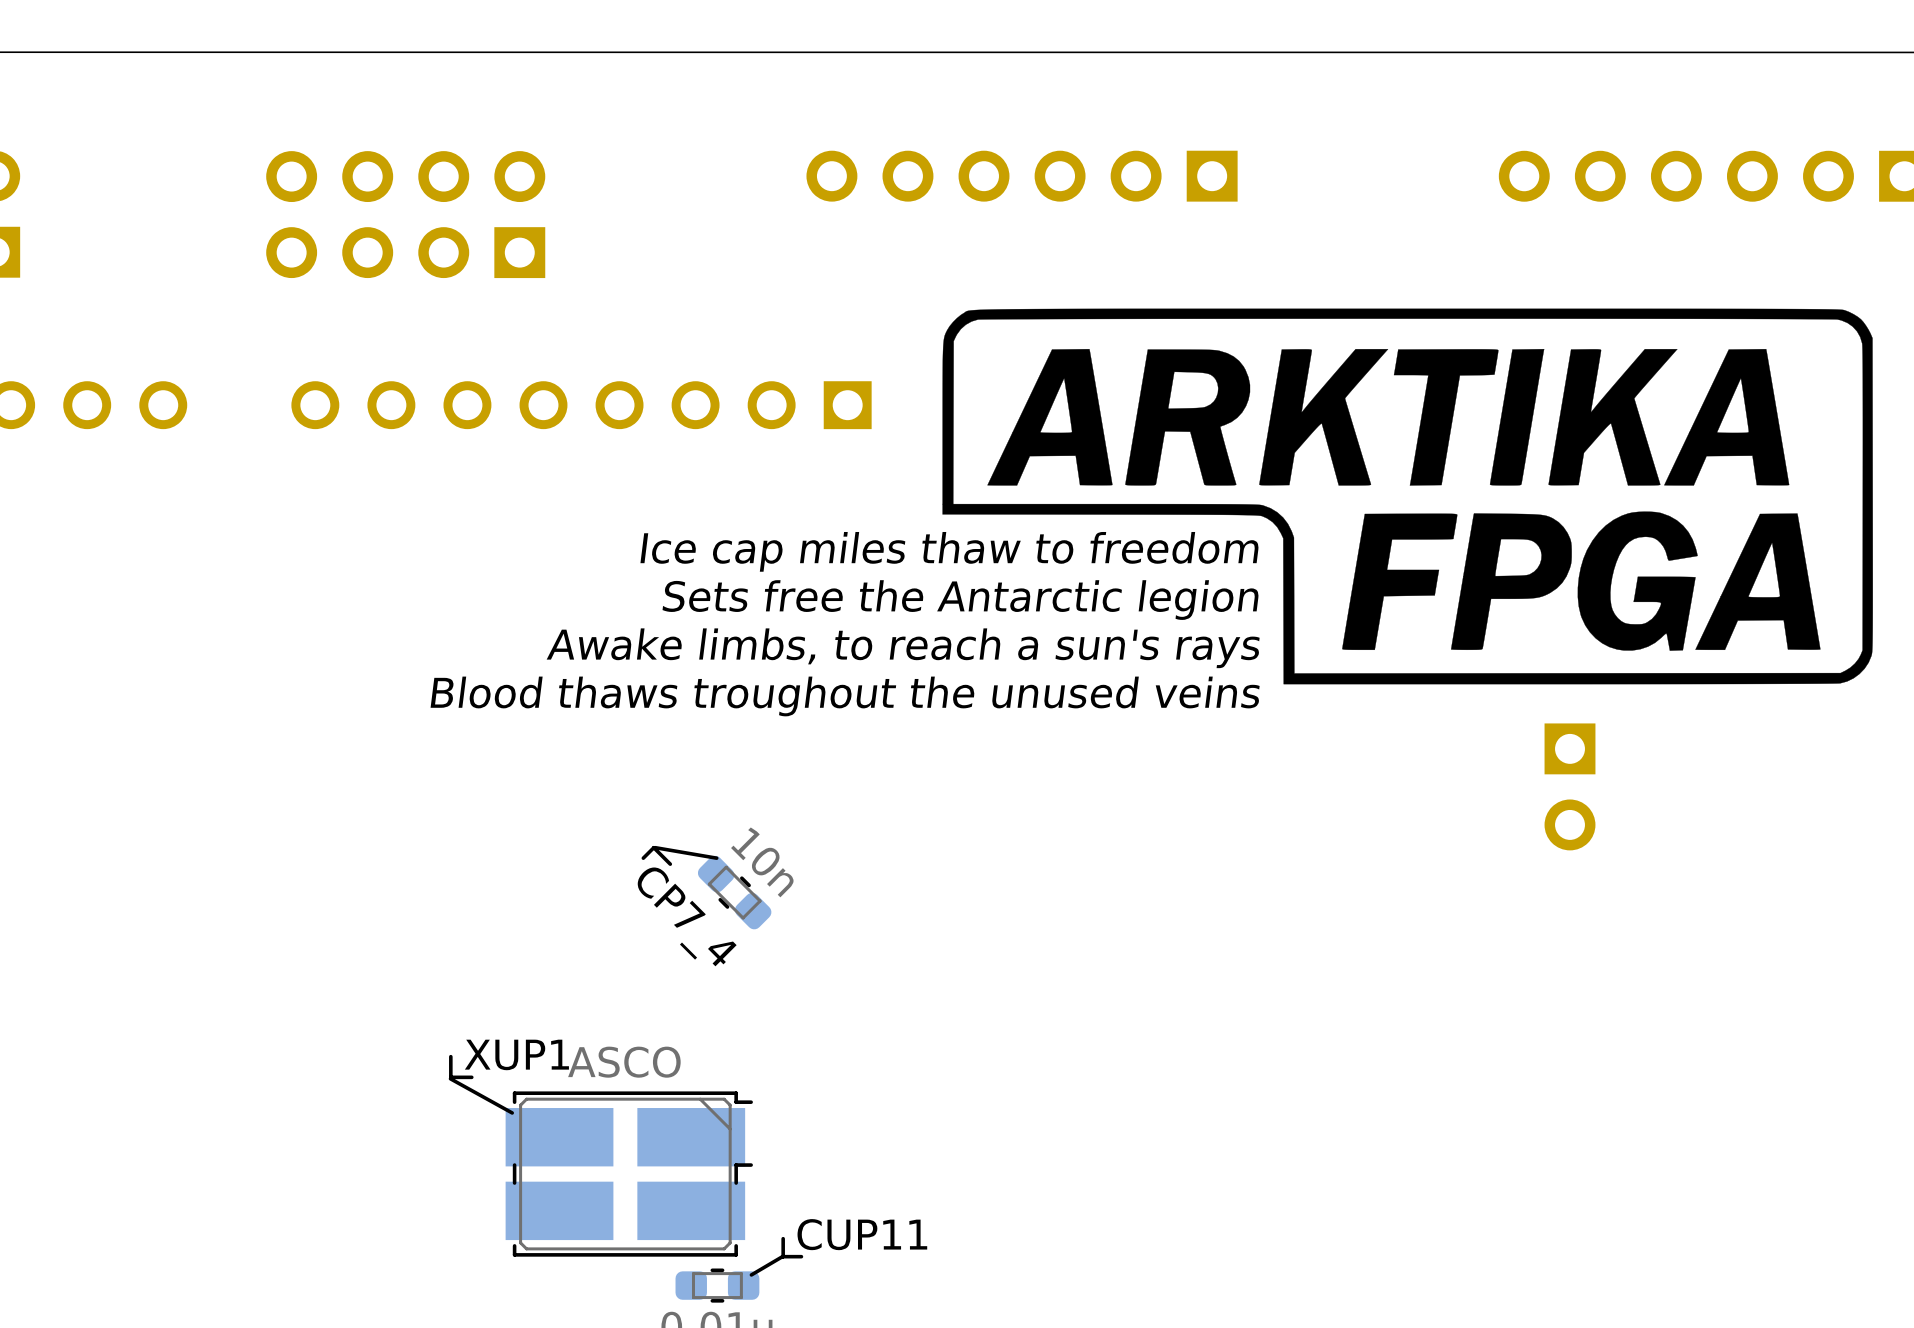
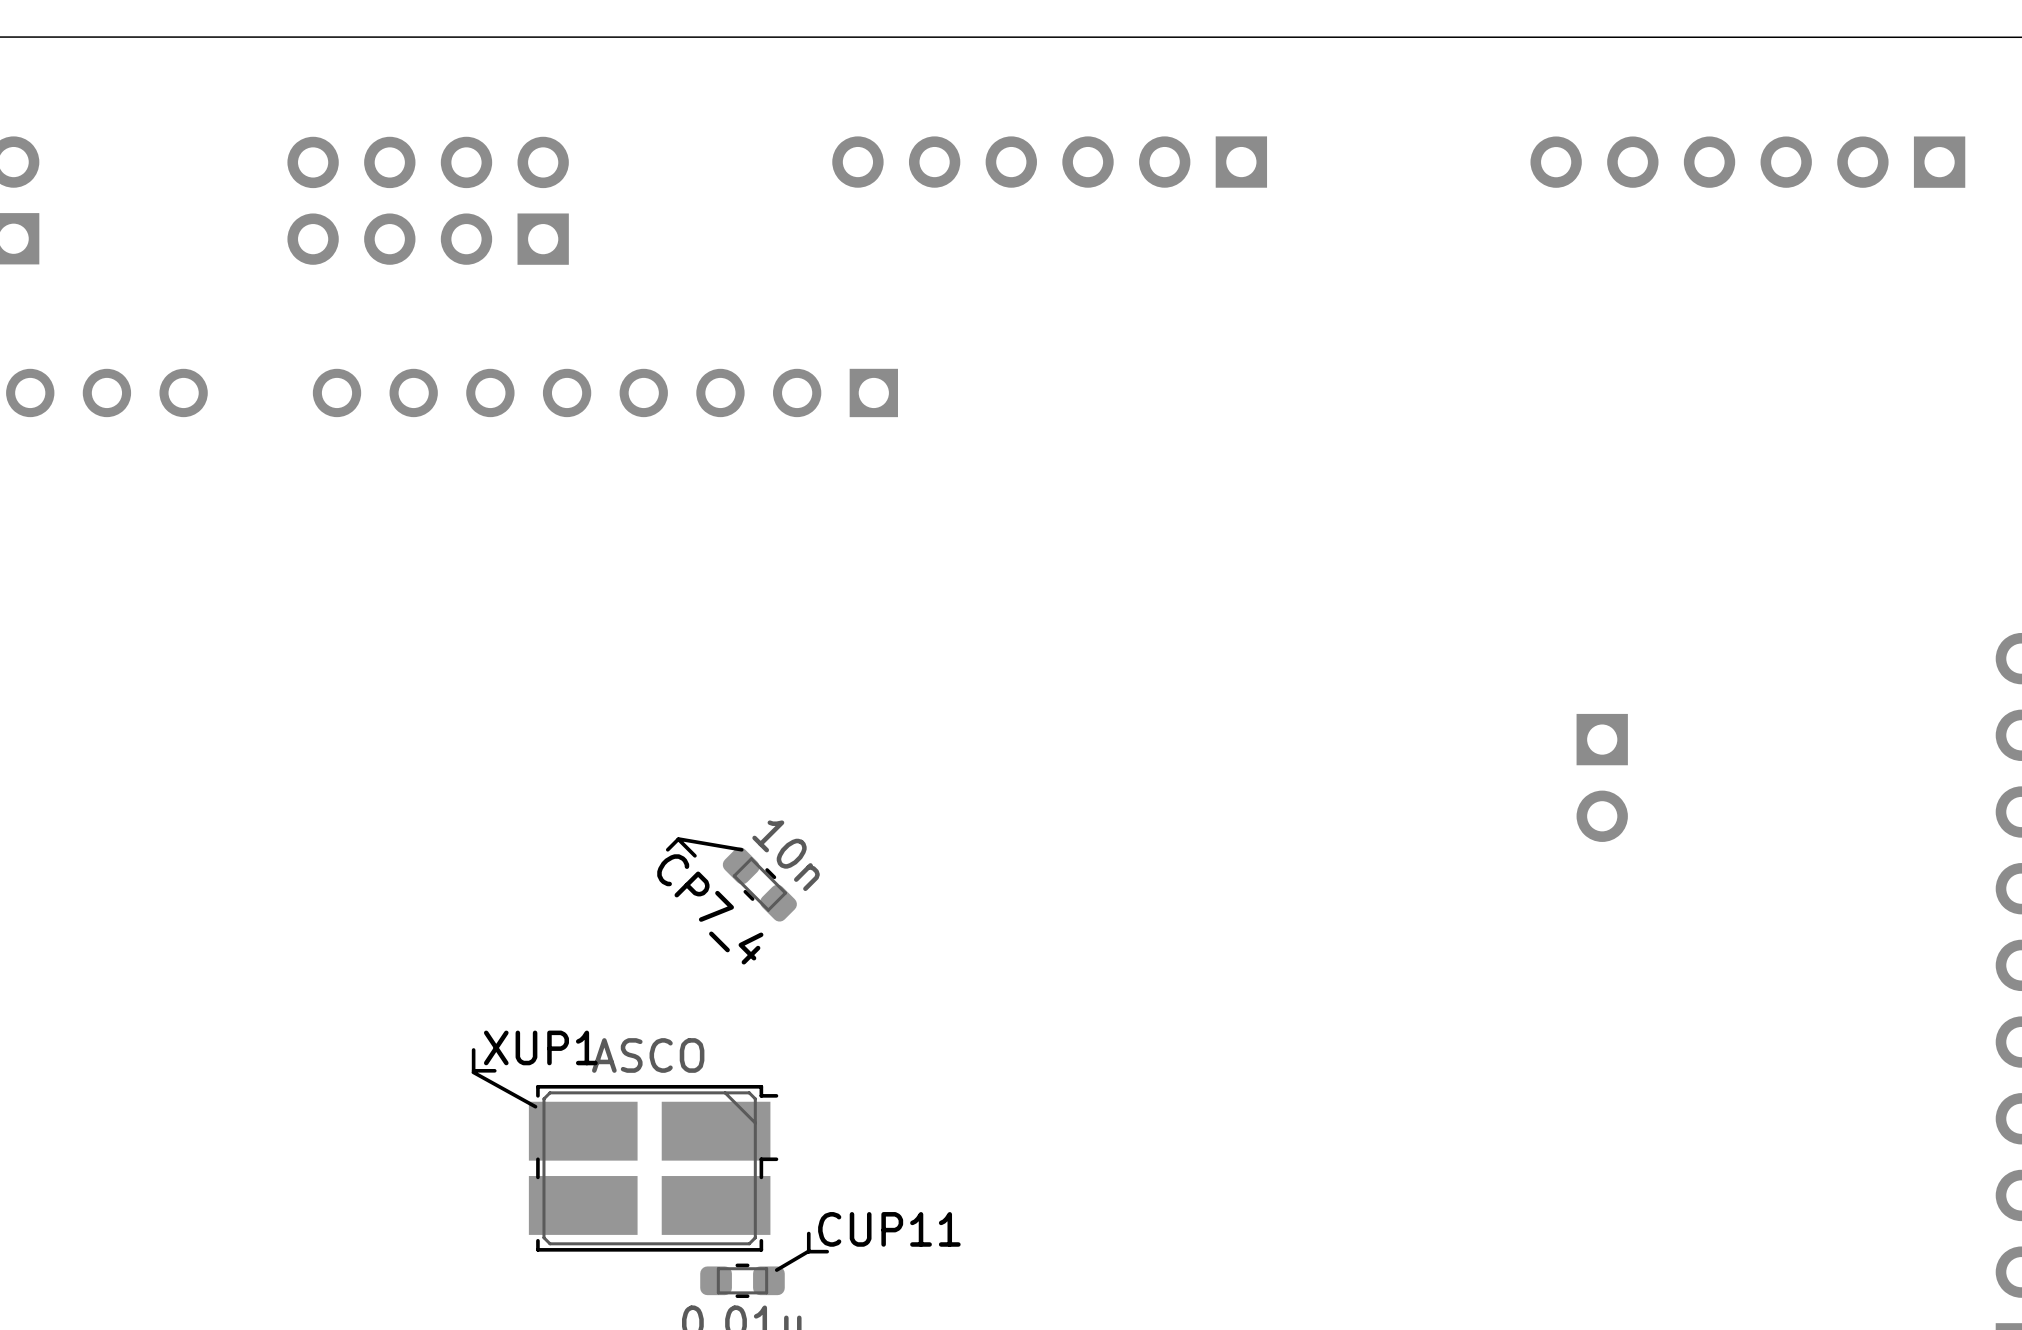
drawing: [942, 308, 1873, 685] -> none
text: Ice cap miles thaw to freedom (949, 551) -> none
text: Sets free the Antarctic legion (960, 600) -> none
text: Awake limbs, to reach a sun's rays (903, 648) -> none
text: Blood thaws troughout the unused veins (845, 696) -> none

